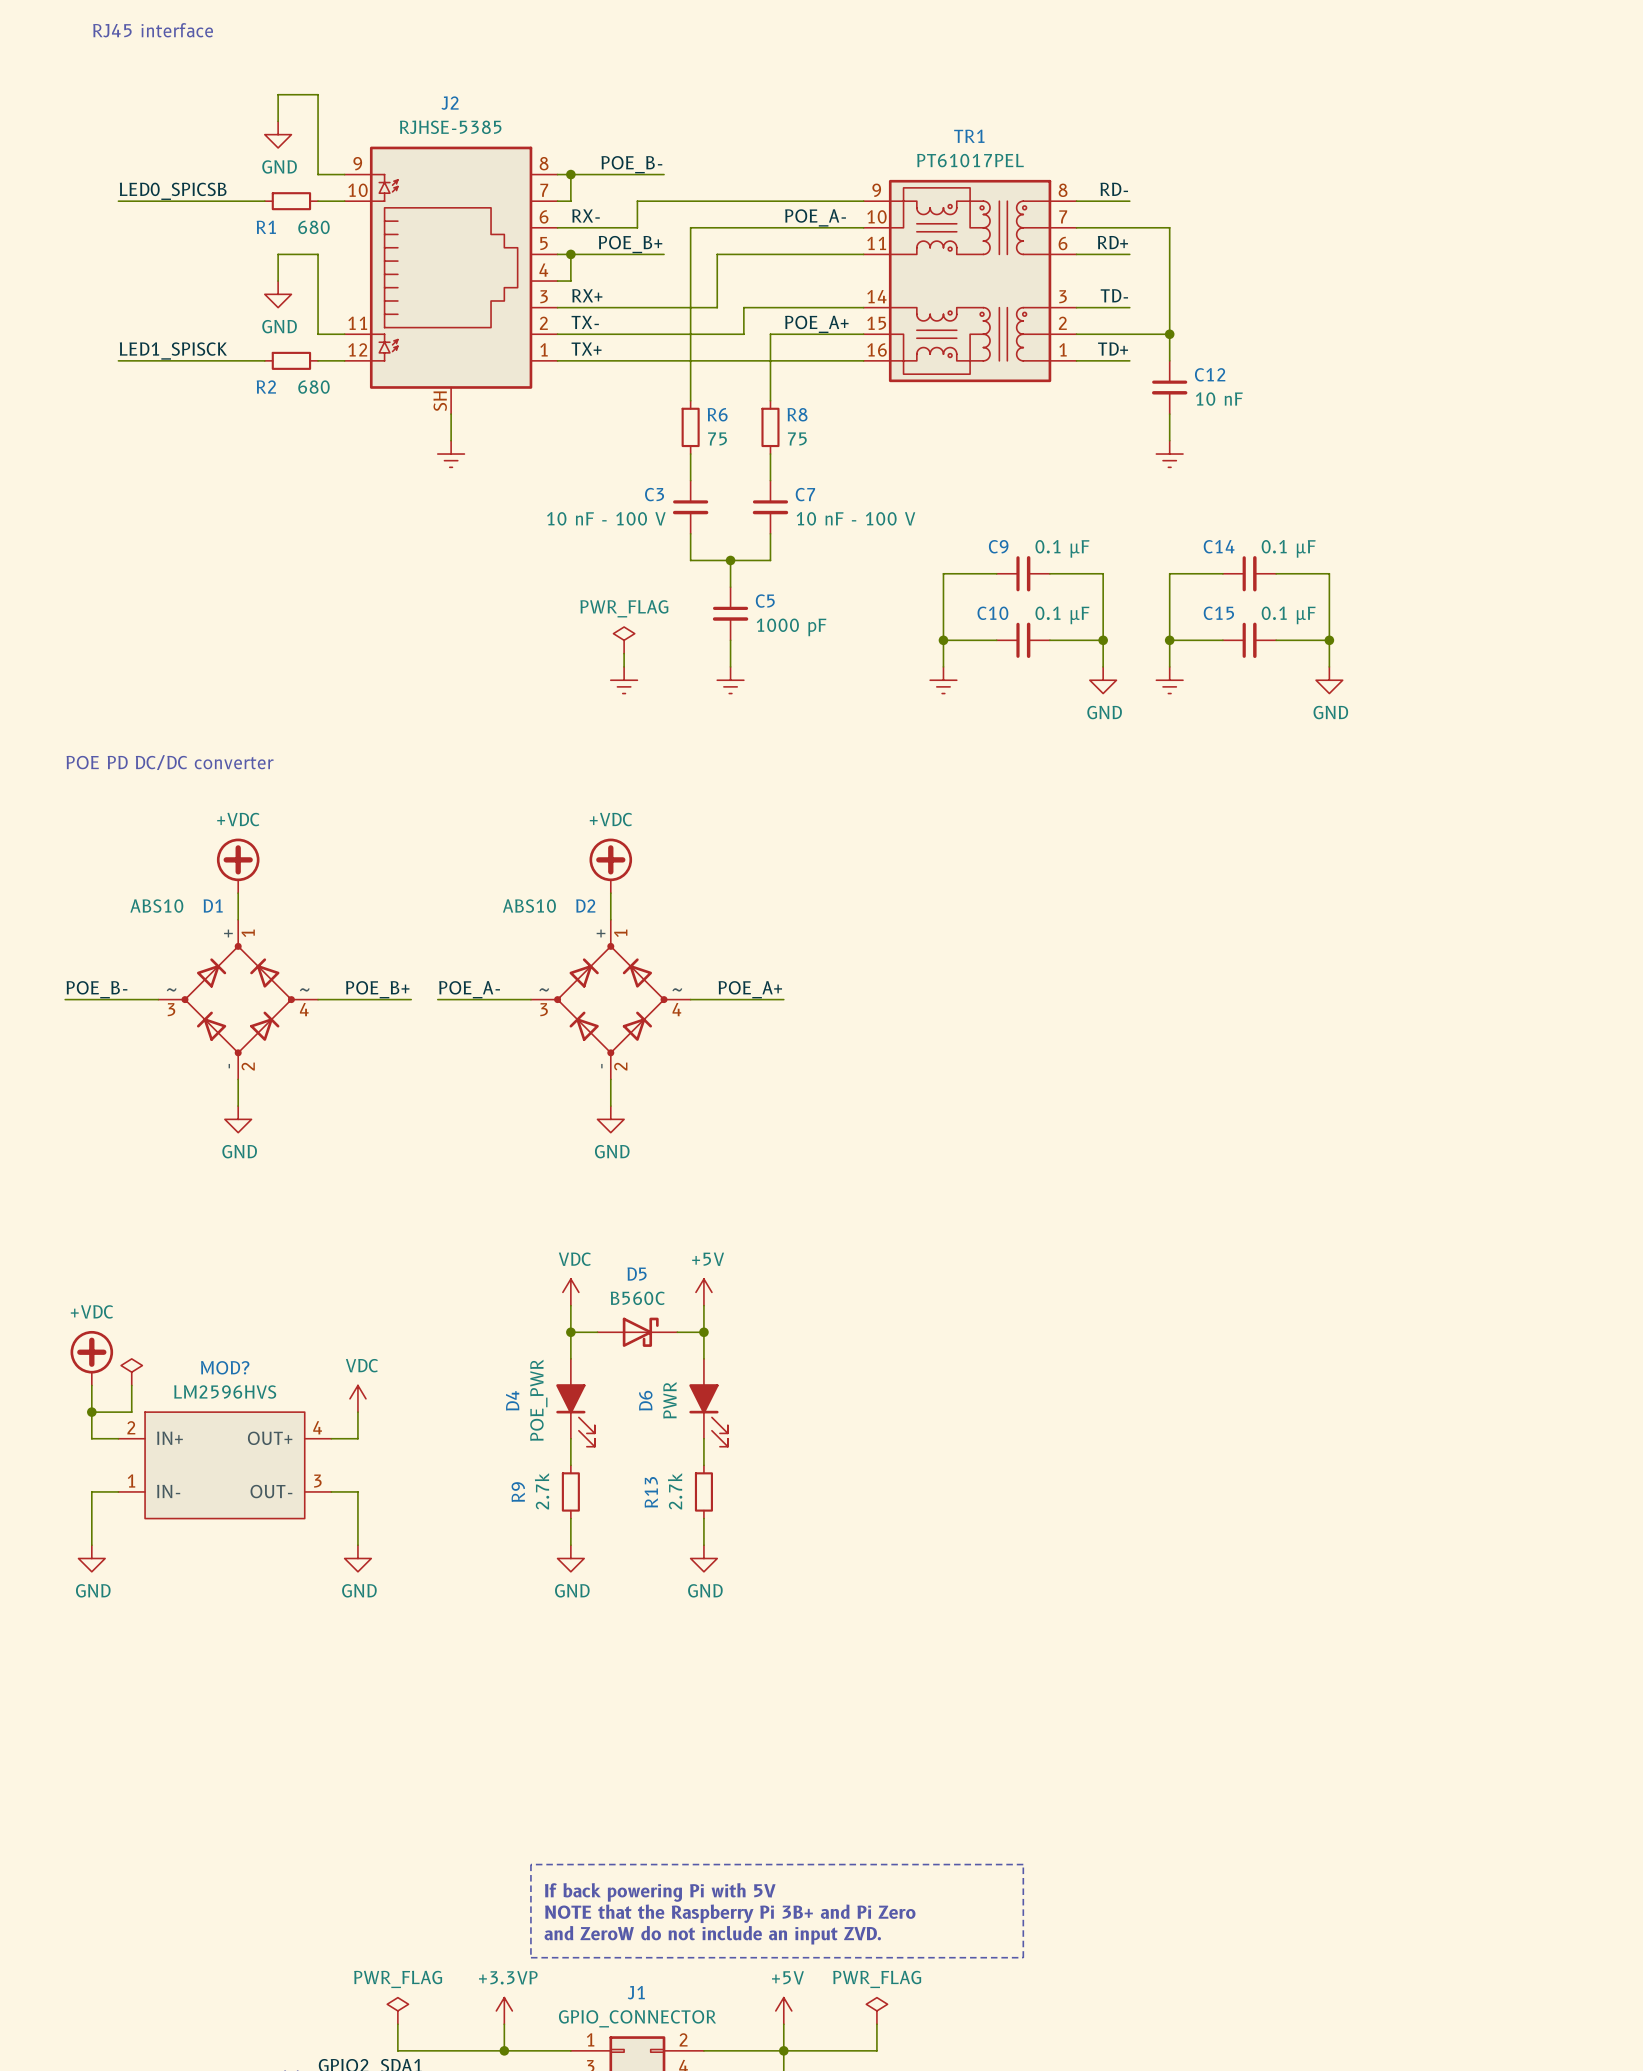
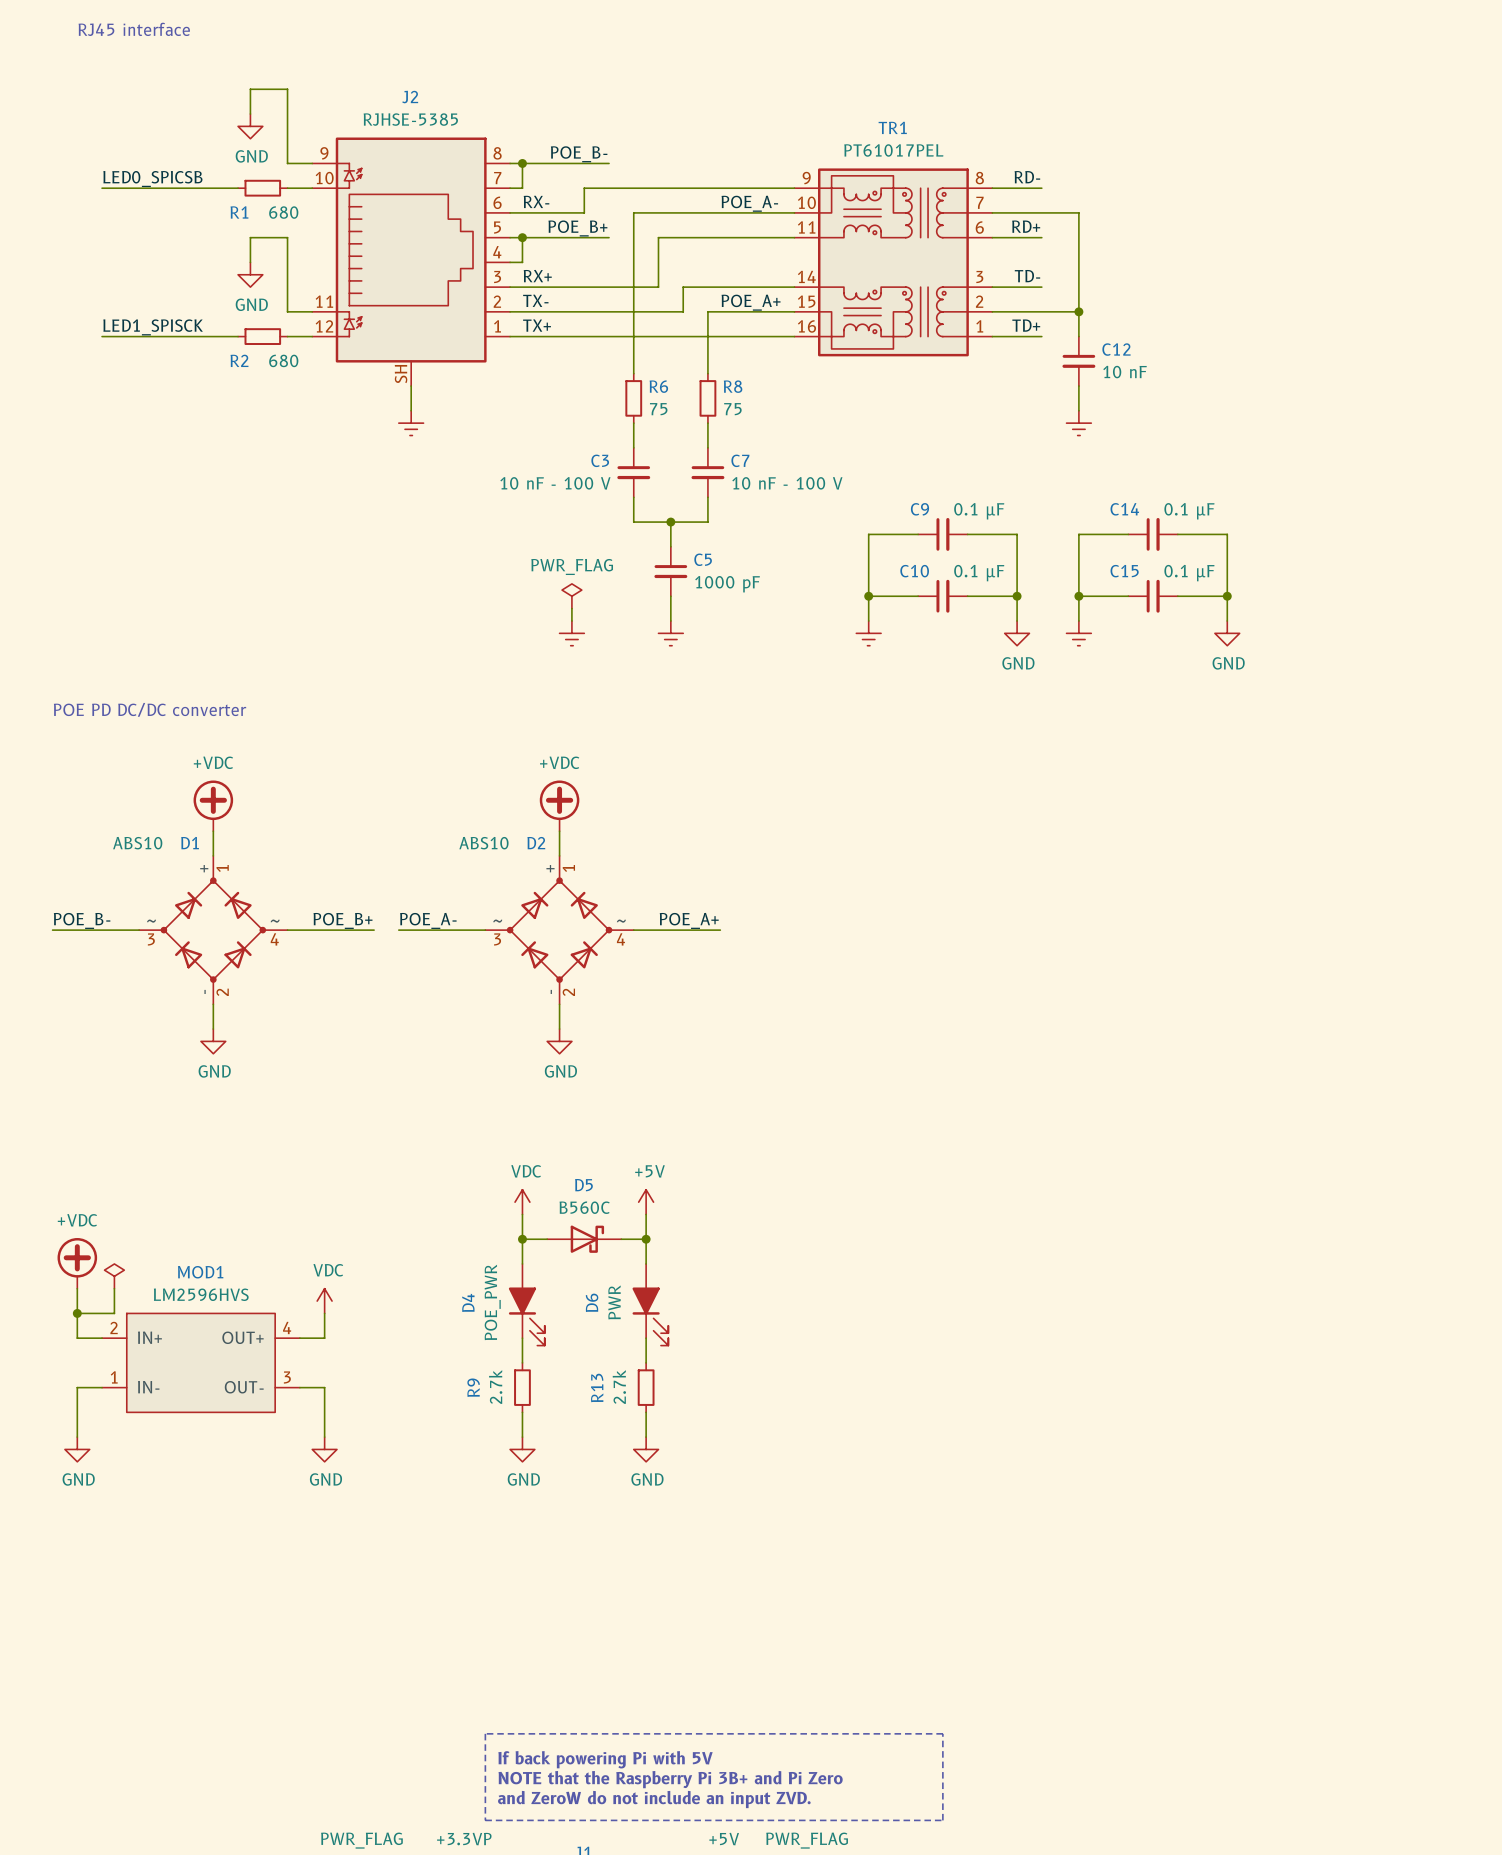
MOD? name: MOD? (225, 1367) -> MOD1 (200, 1272)

